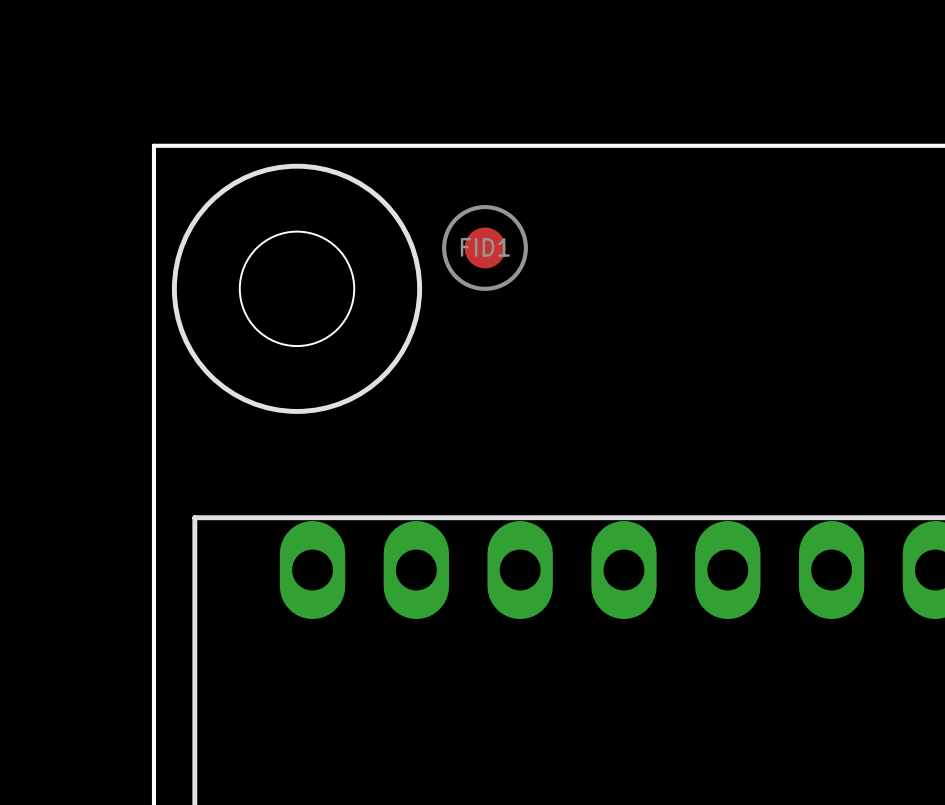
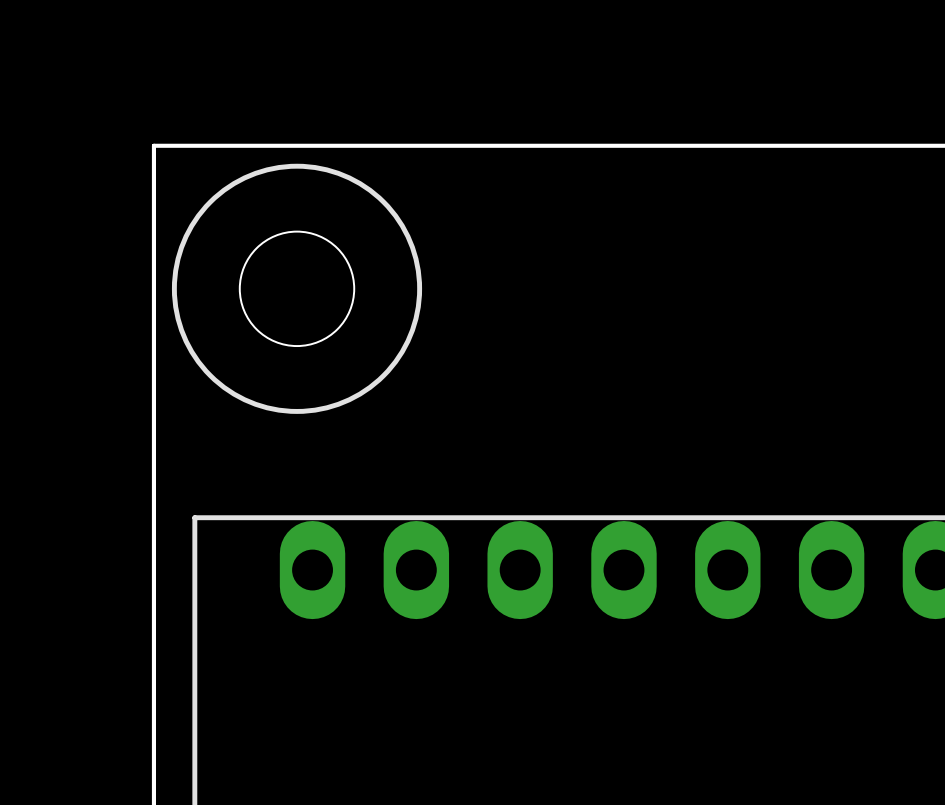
FID1: (485, 247) -> none

